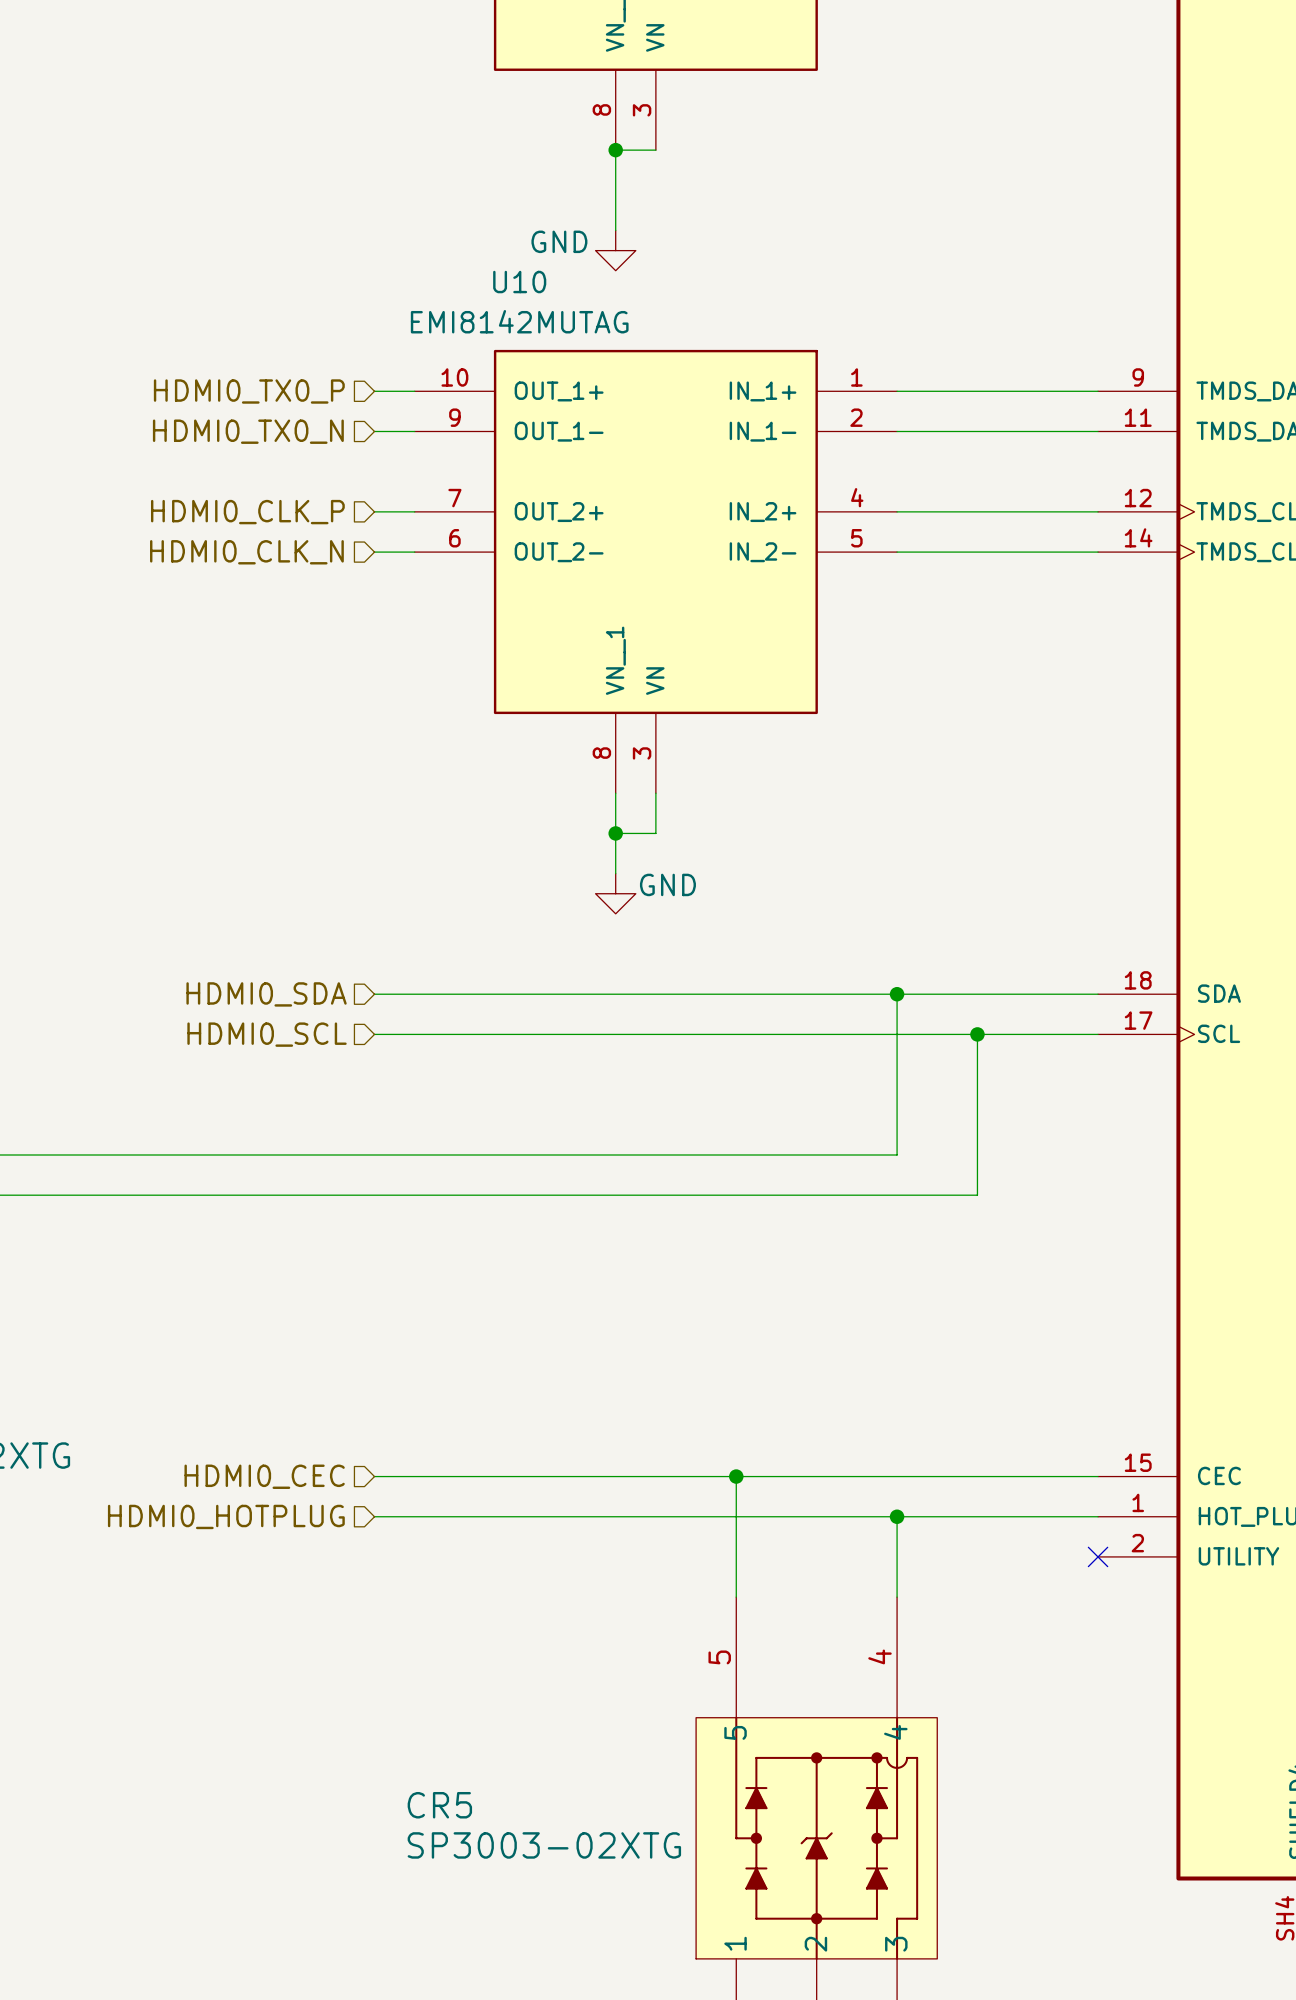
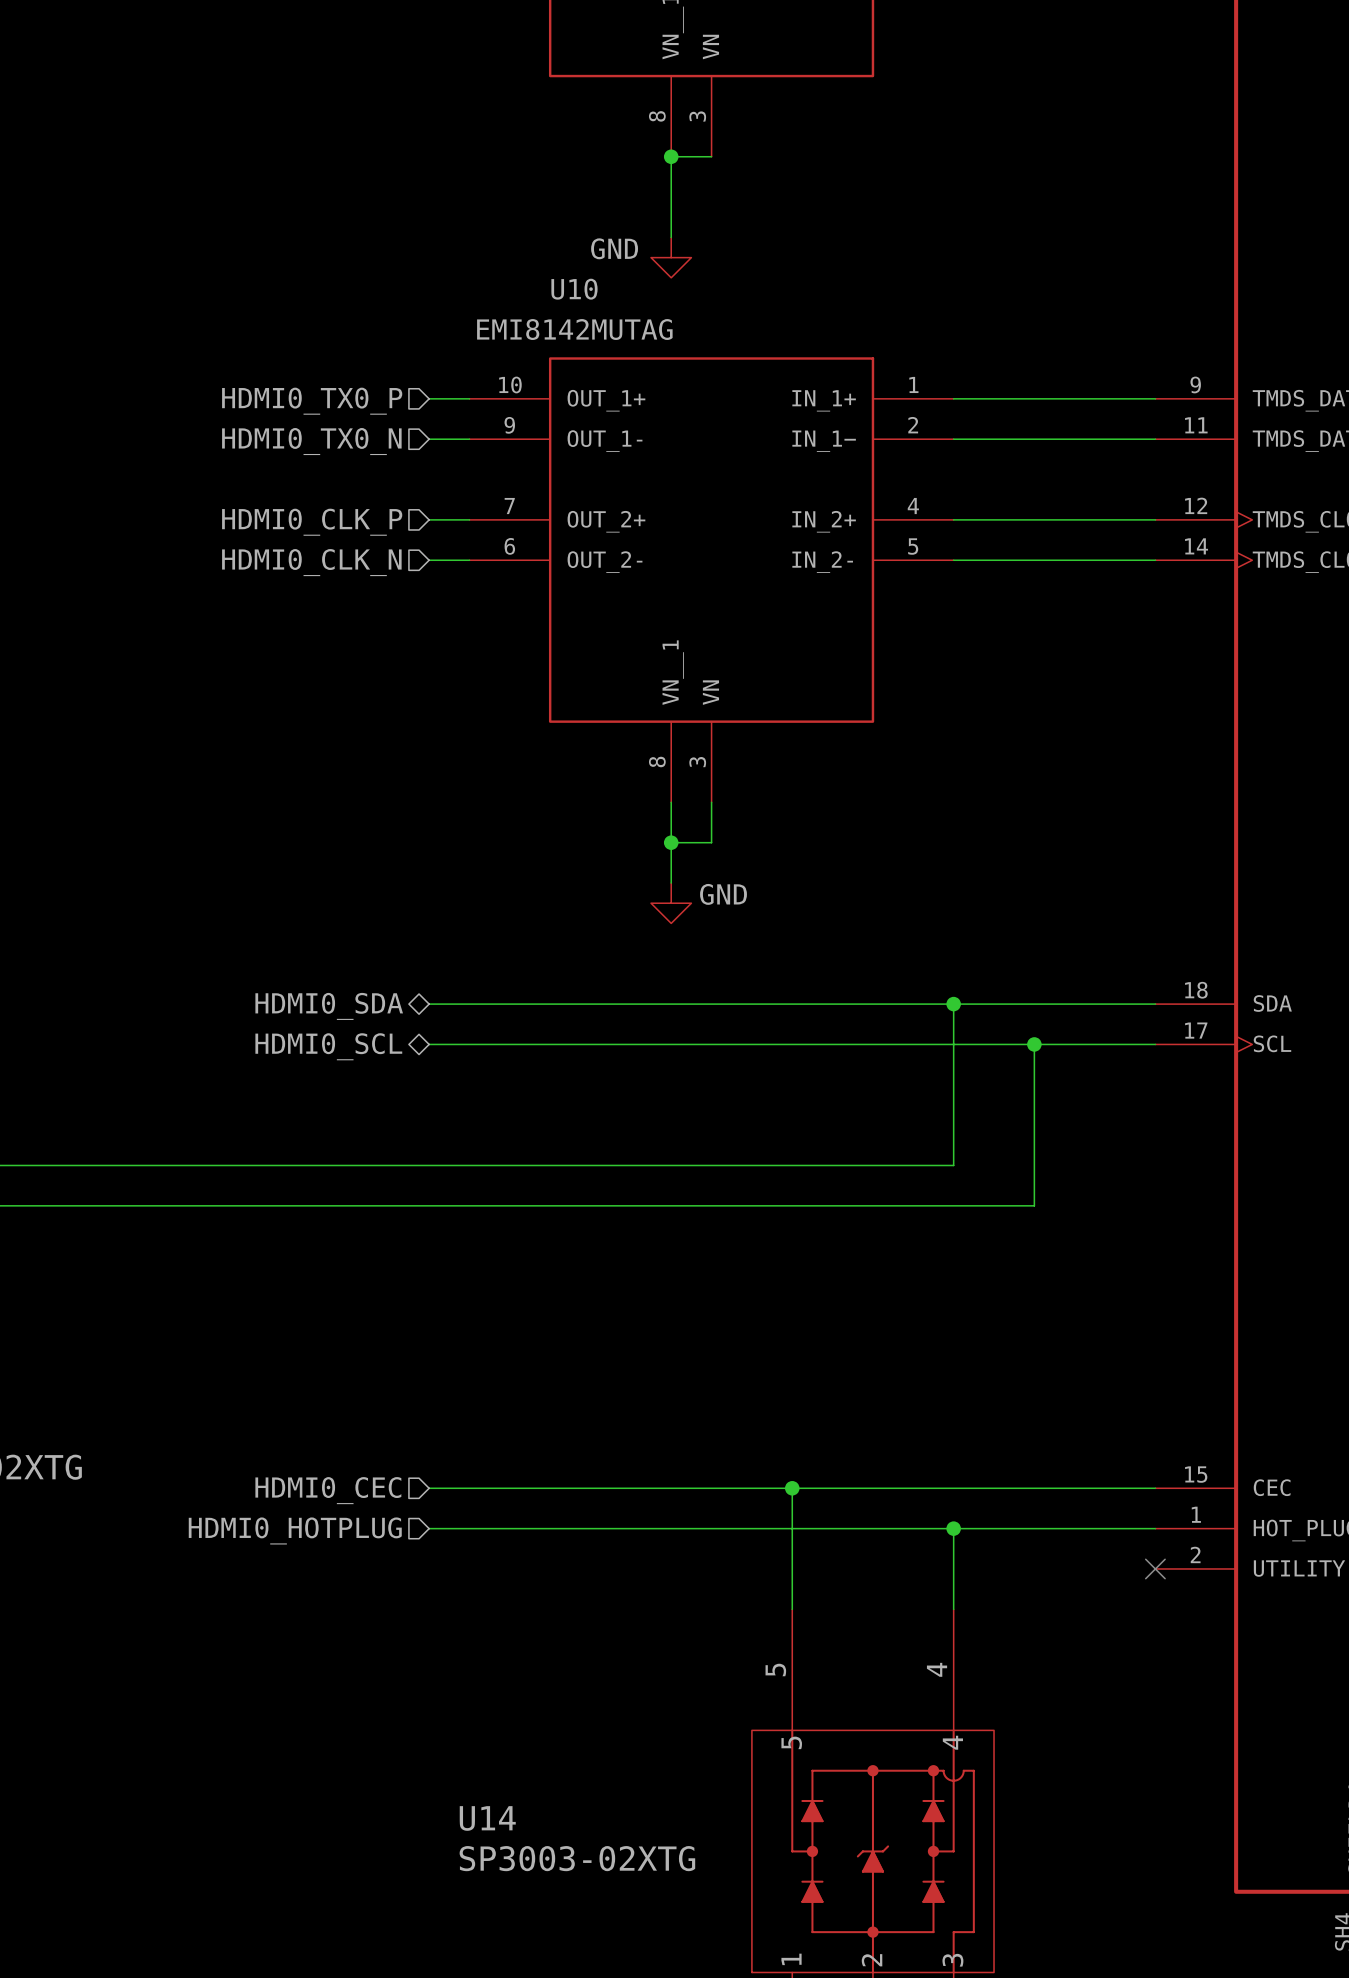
hierarchical label shape: input (266, 994) -> bidirectional (329, 1006)
hierarchical label shape: input (267, 1034) -> bidirectional (328, 1046)
CR5 name: CR5 (439, 1805) -> U14 (487, 1818)

